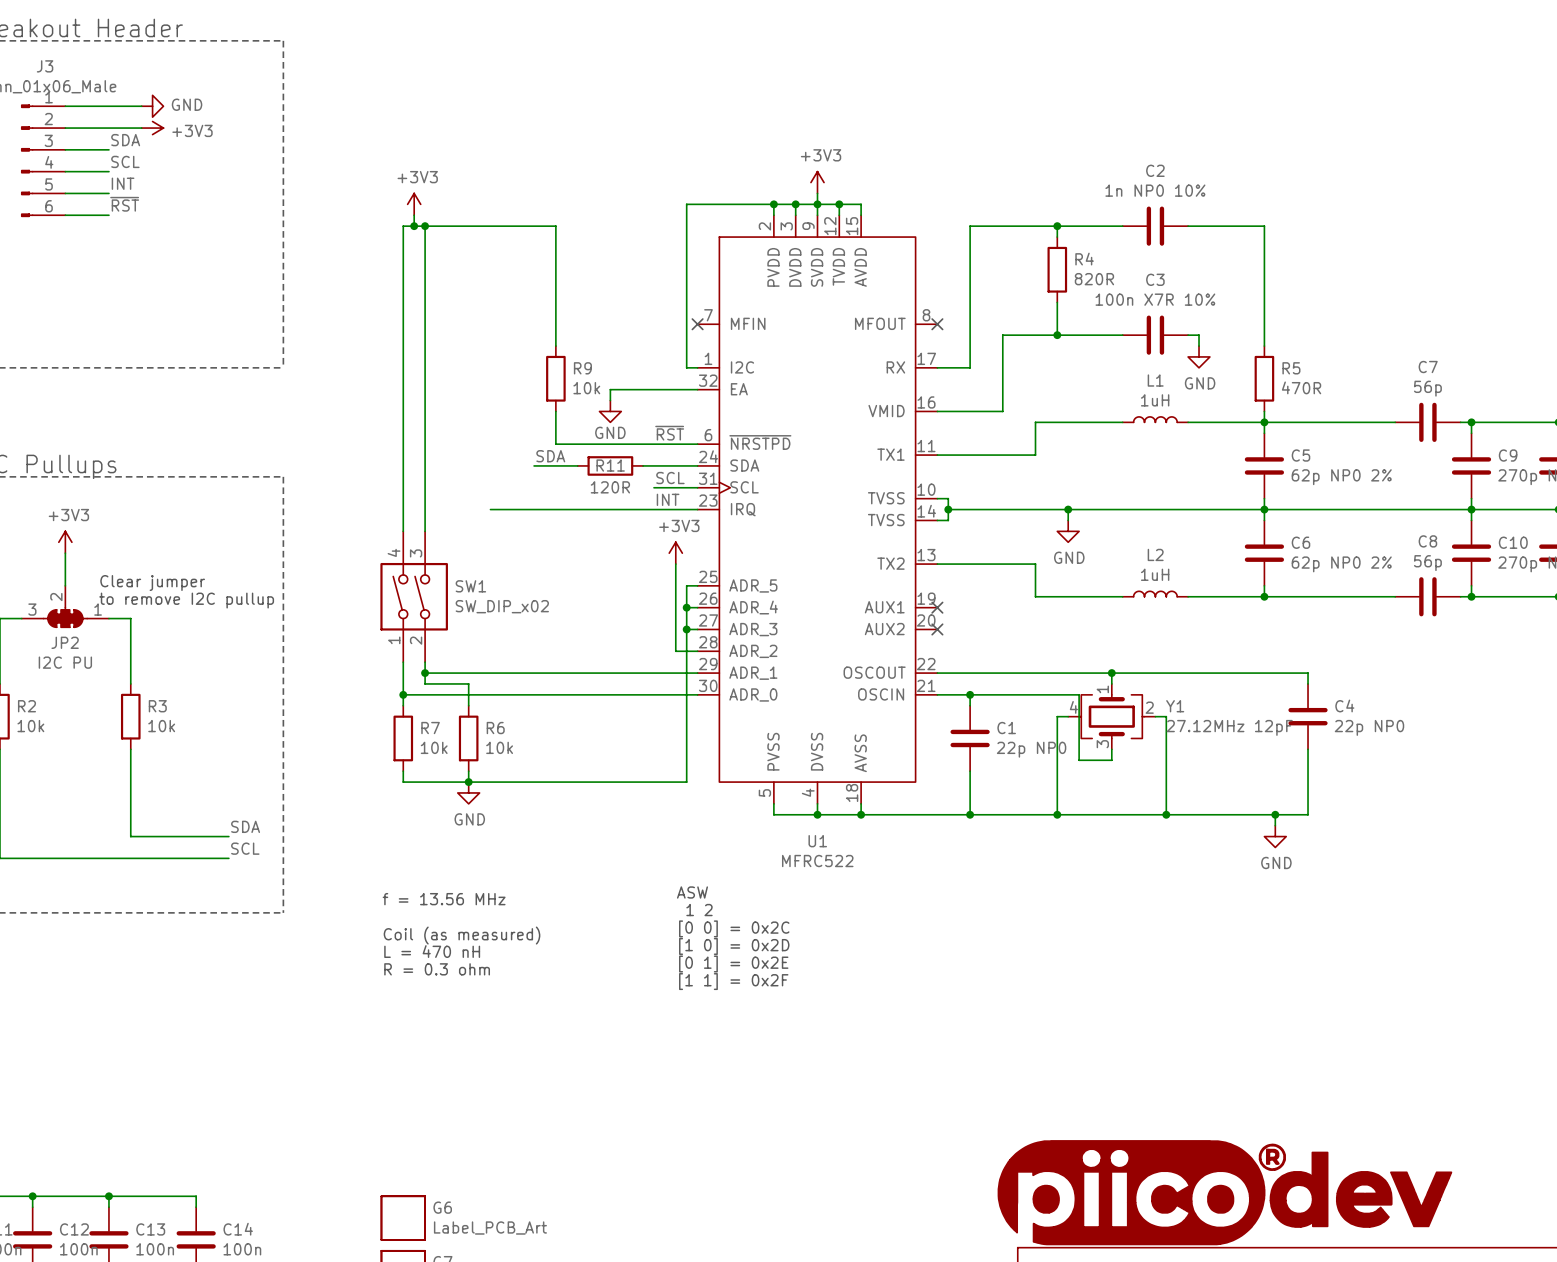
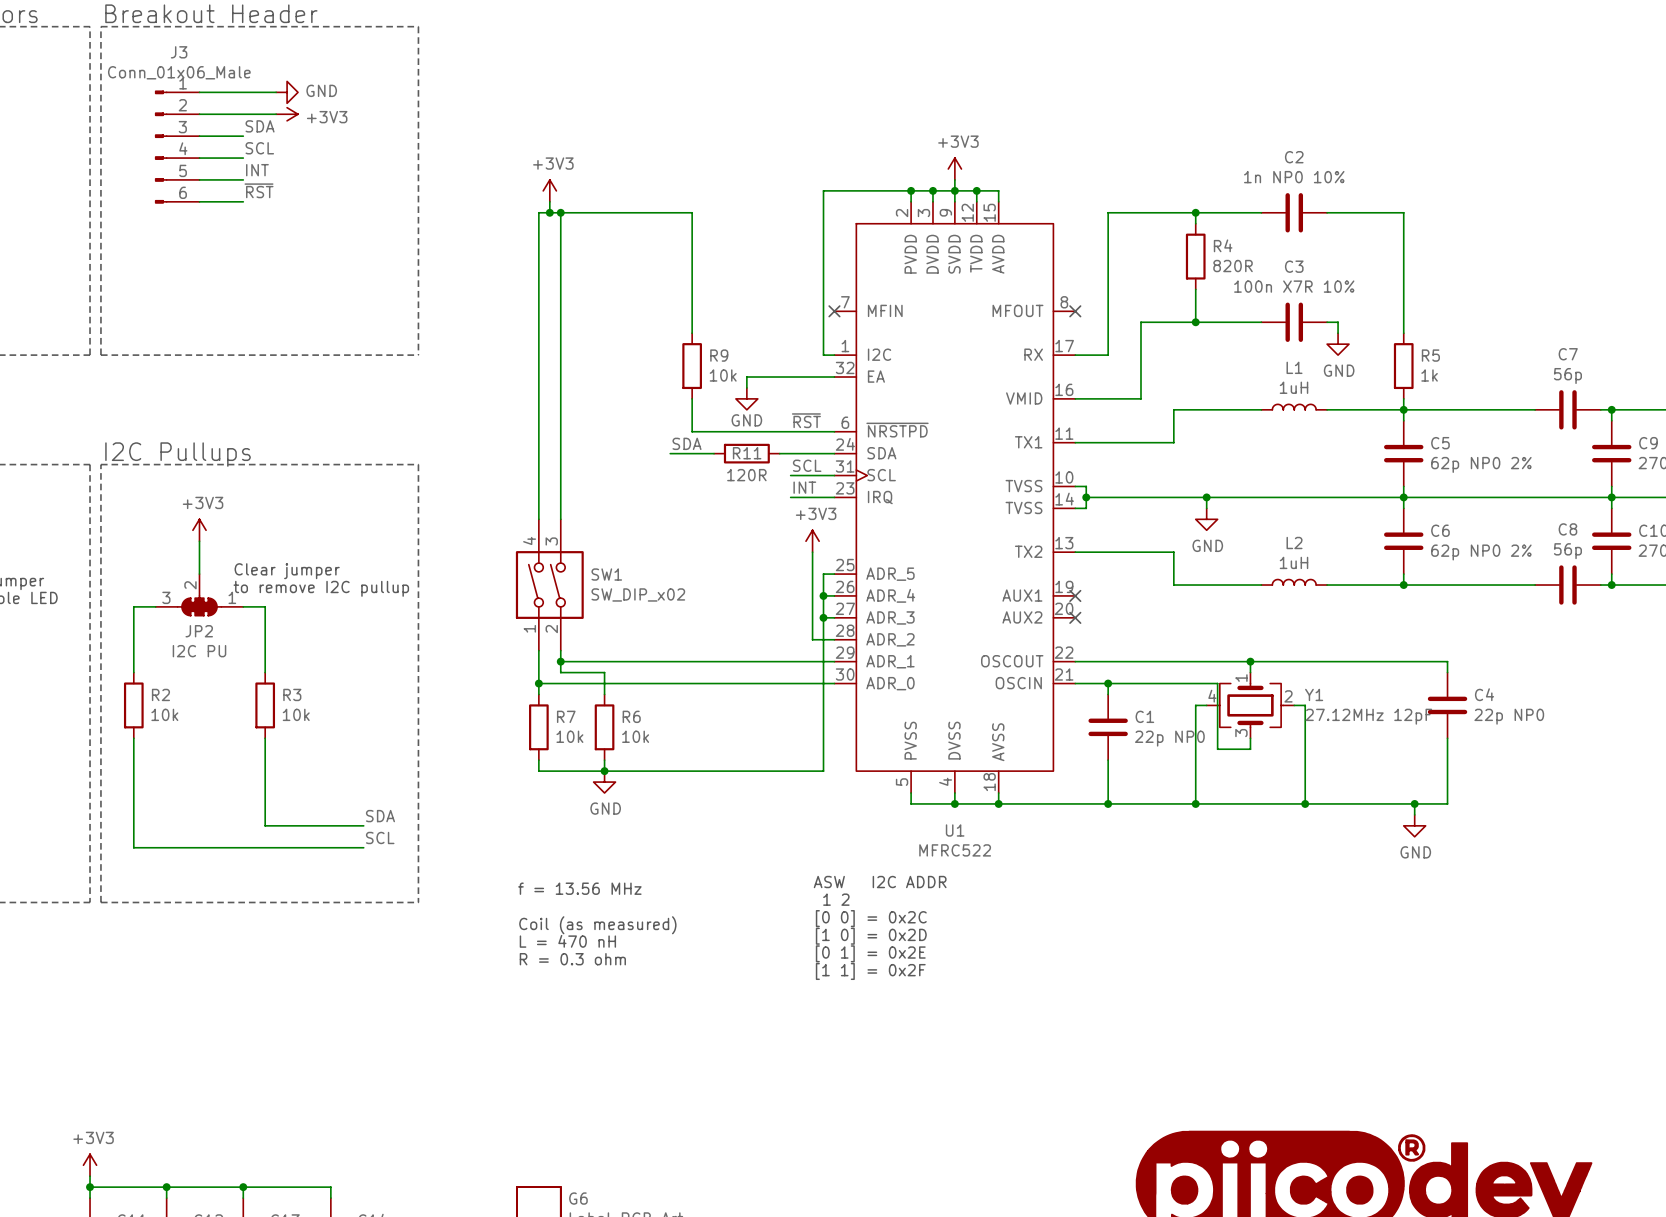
R5 value: 470R (1301, 387) -> 1k (1429, 375)
wire: (490, 509) (653, 509) -> none
text: ASW (692, 892) -> ASW I2C ADDR (880, 882)

